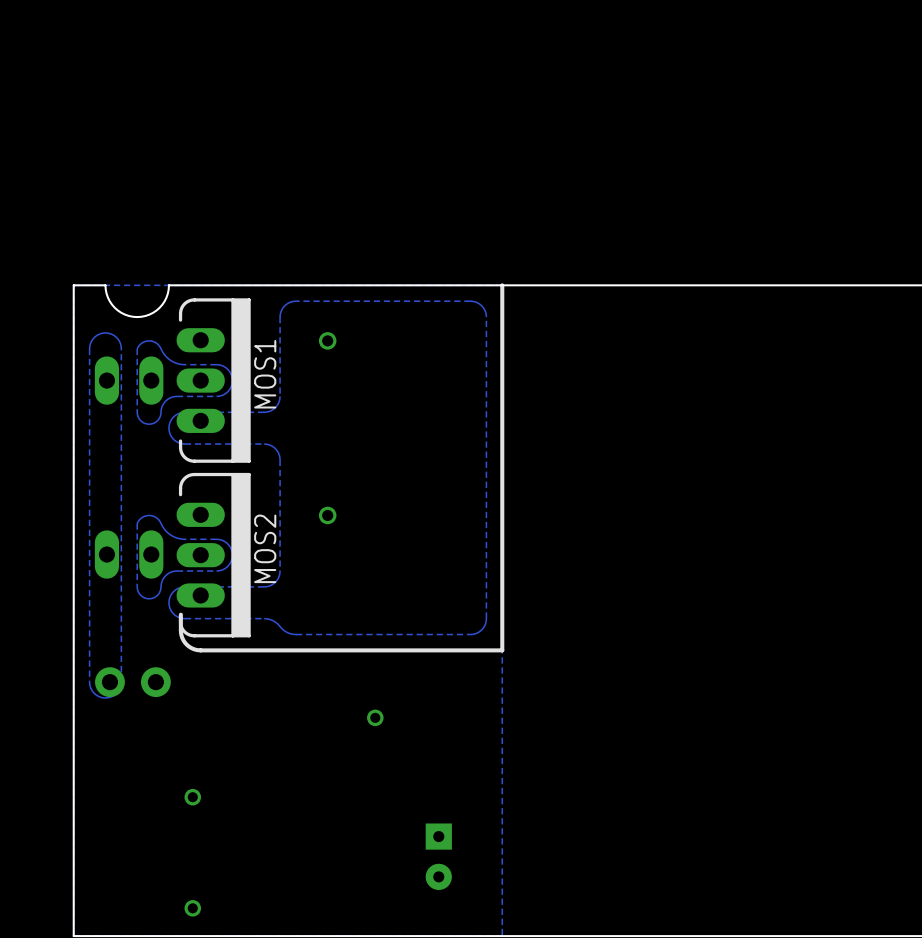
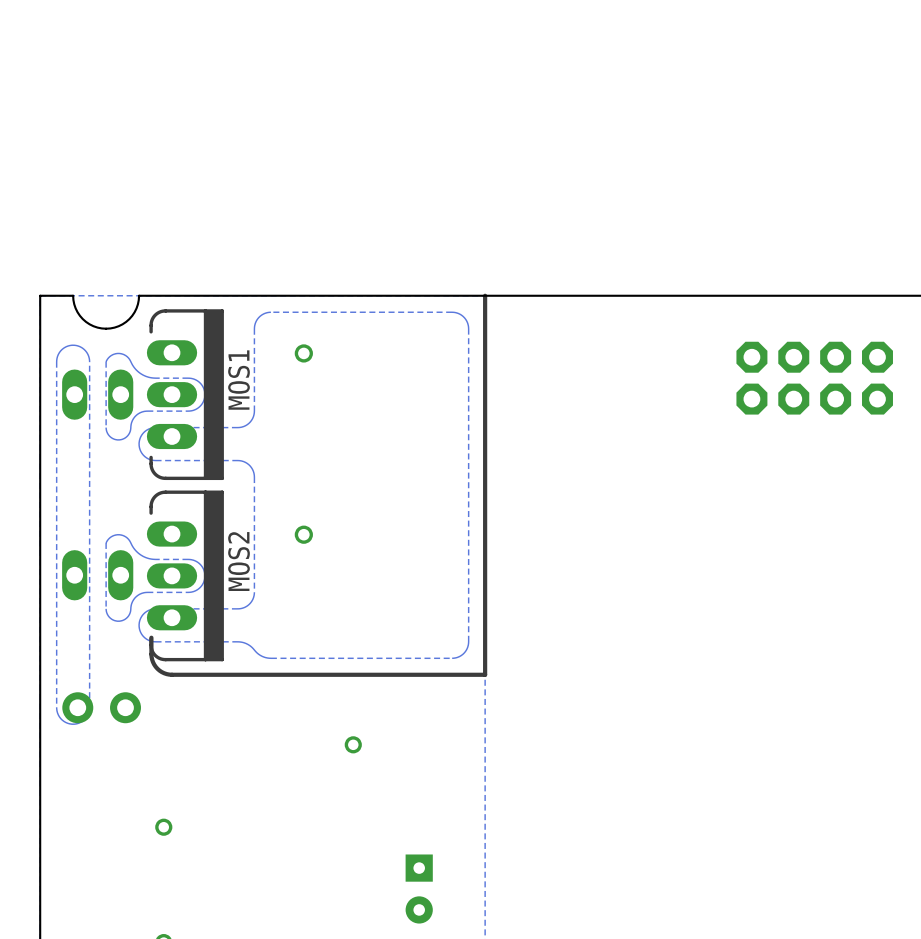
part: none -> (814, 378)

